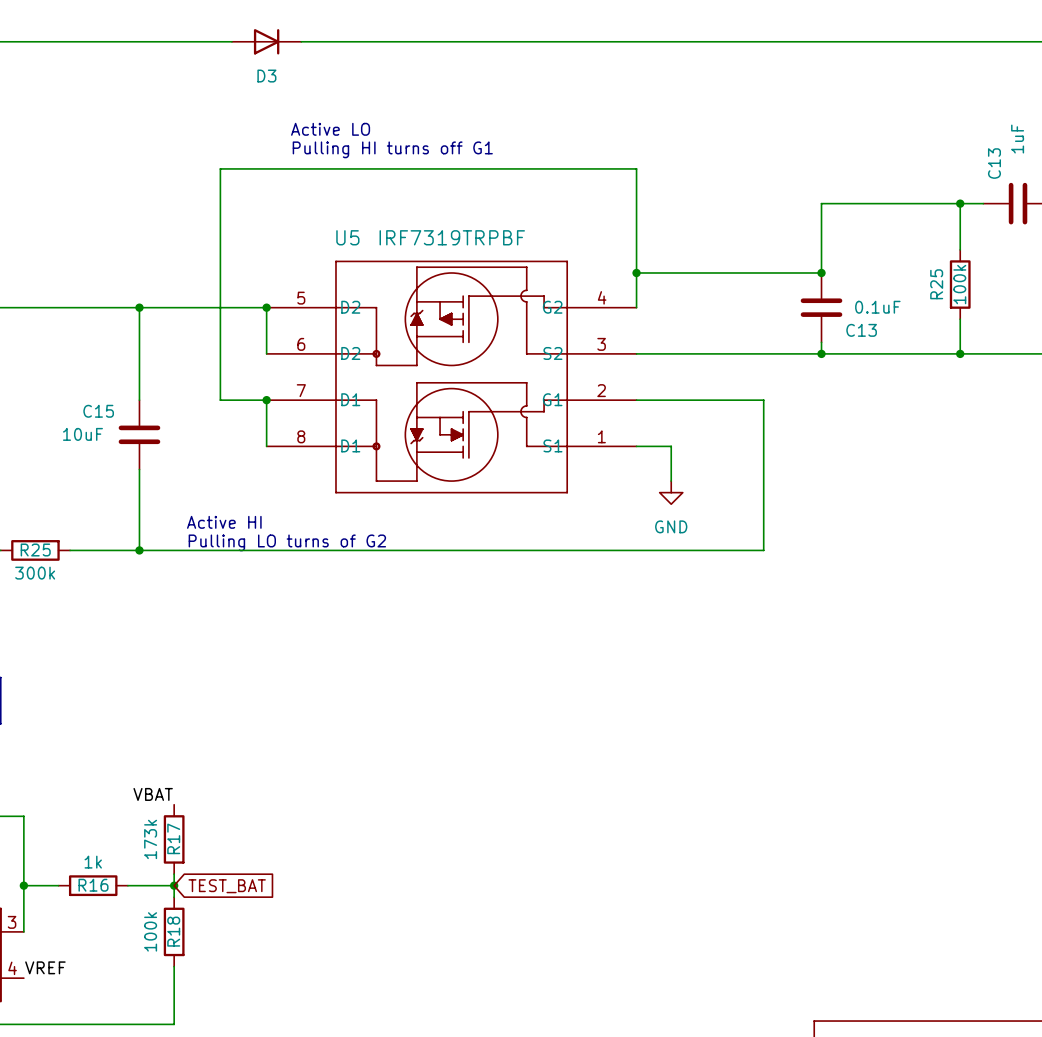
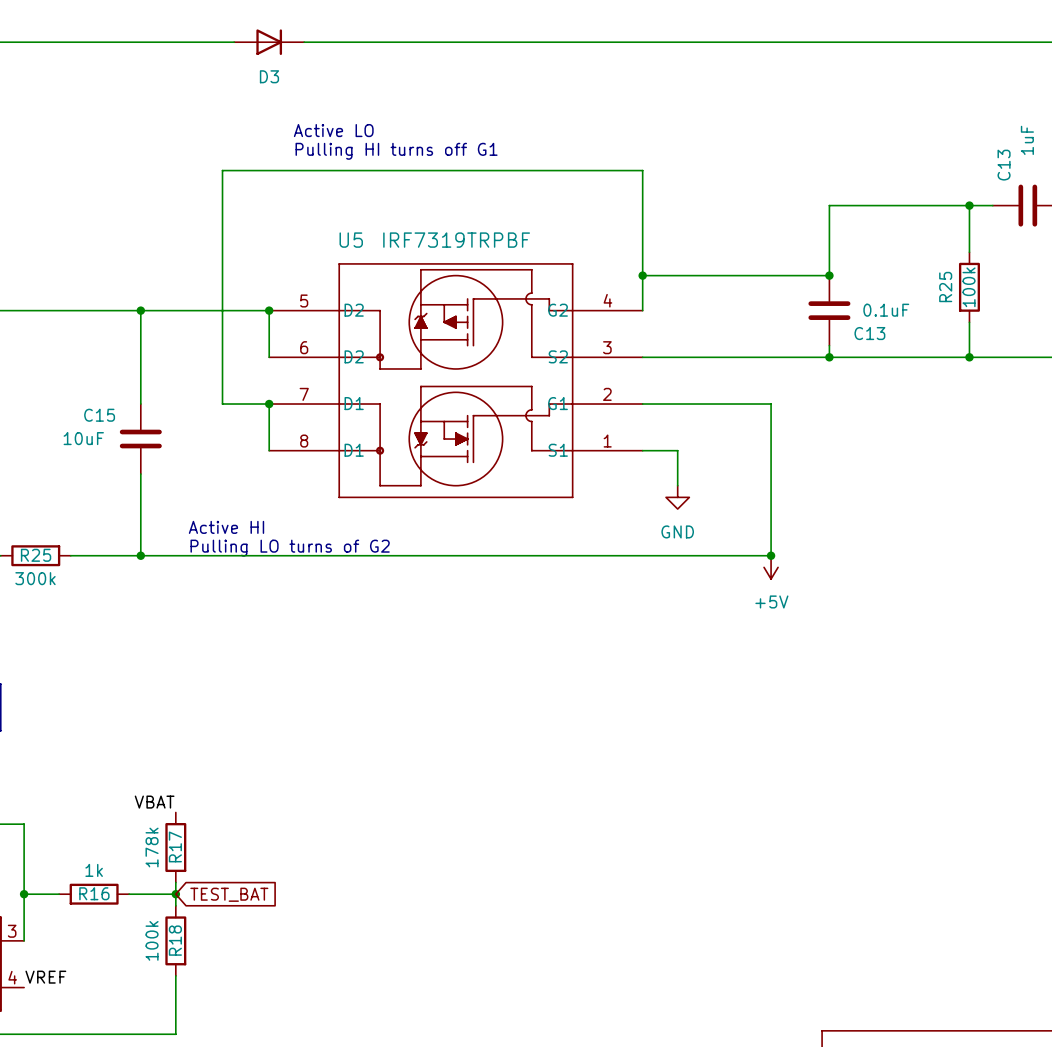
junction: none -> (771, 555)
power symbol: none -> +5V (771, 567)
R17 value: 173k (150, 839) -> 178k (152, 847)

